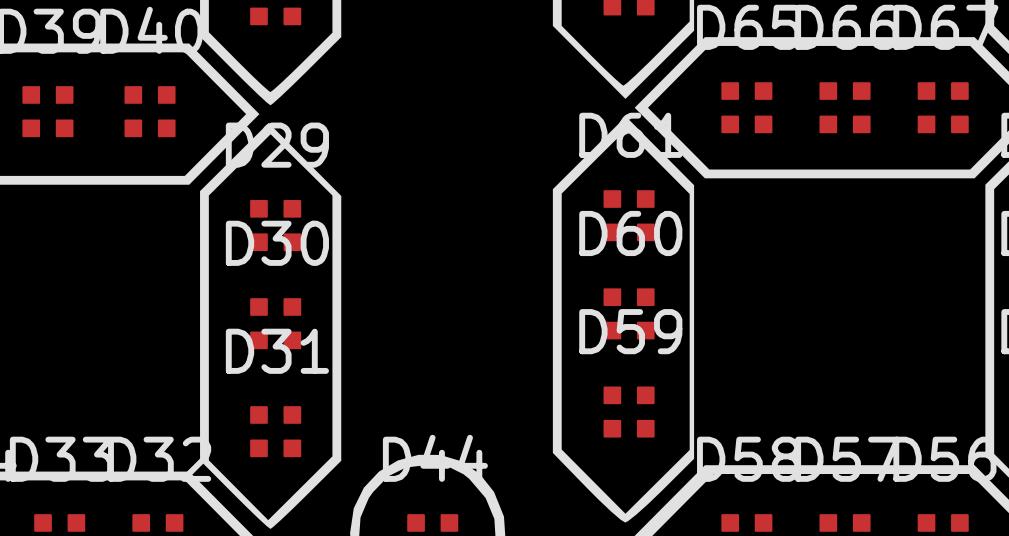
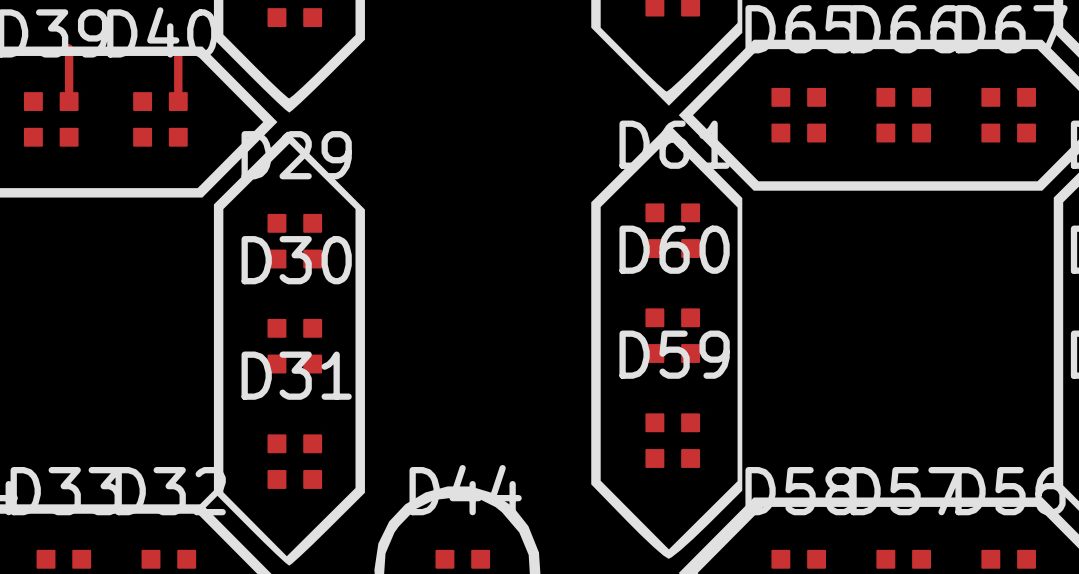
track: none -> (68, 48) (69, 101)
track: none -> (177, 52) (178, 101)

